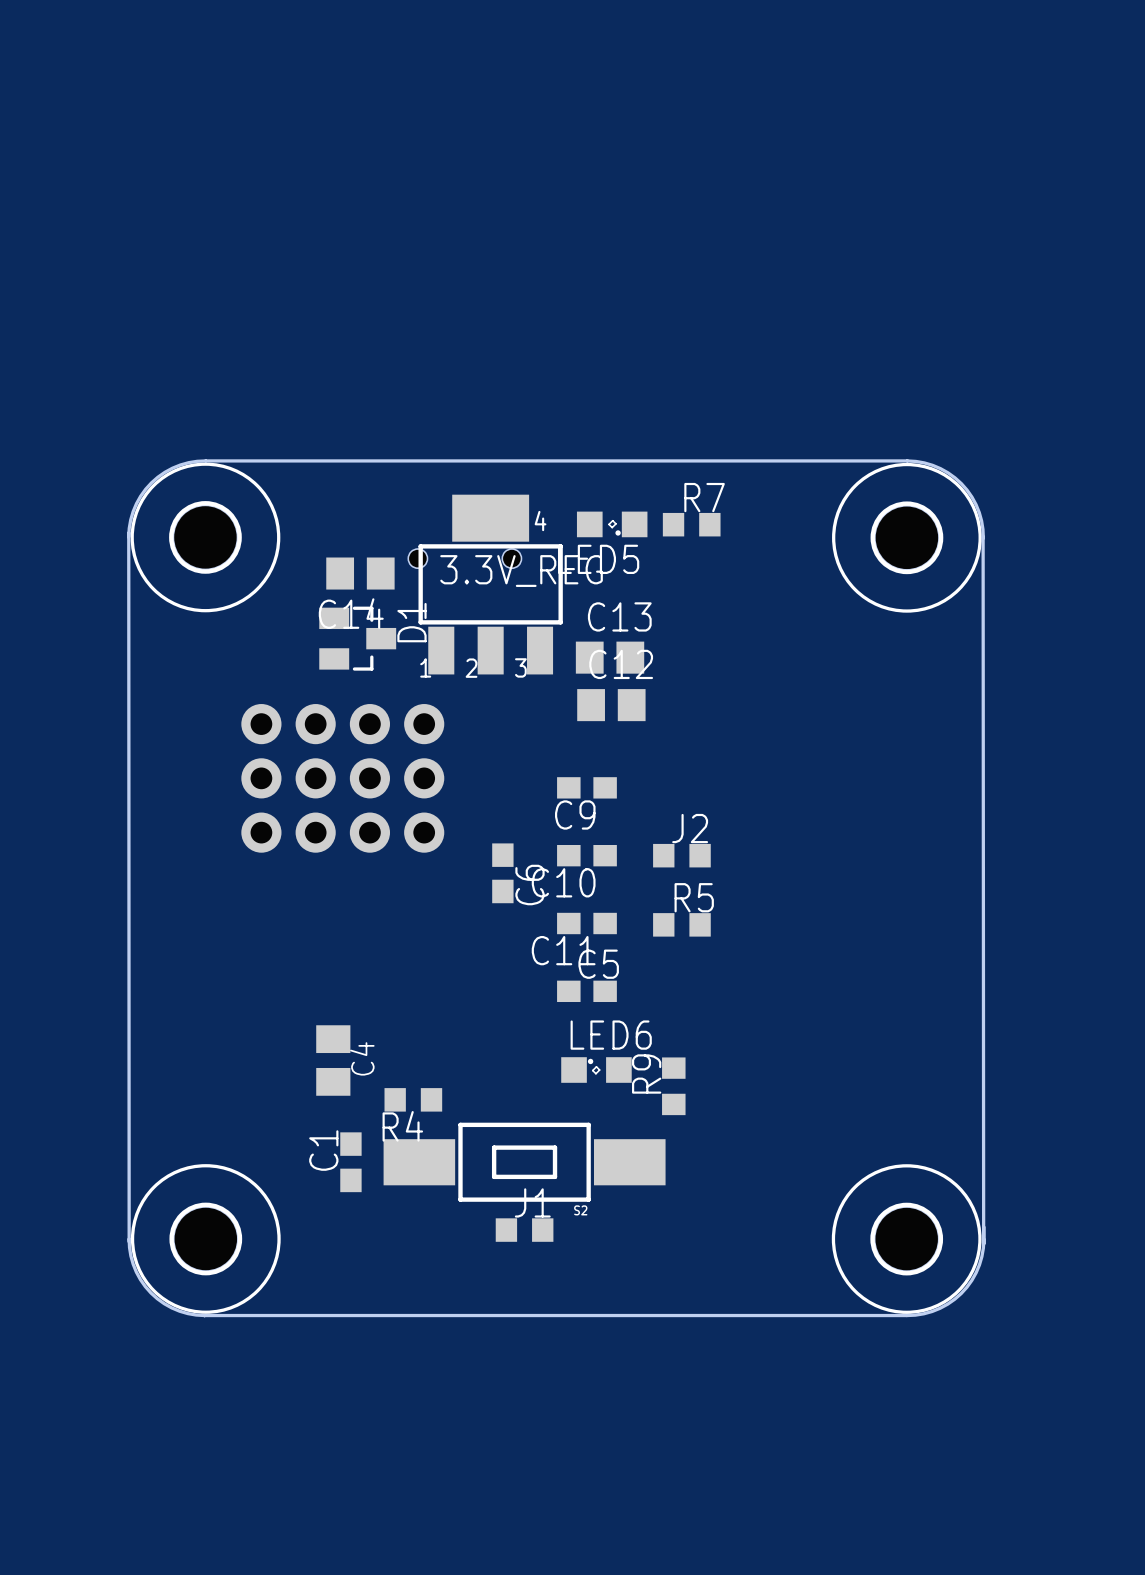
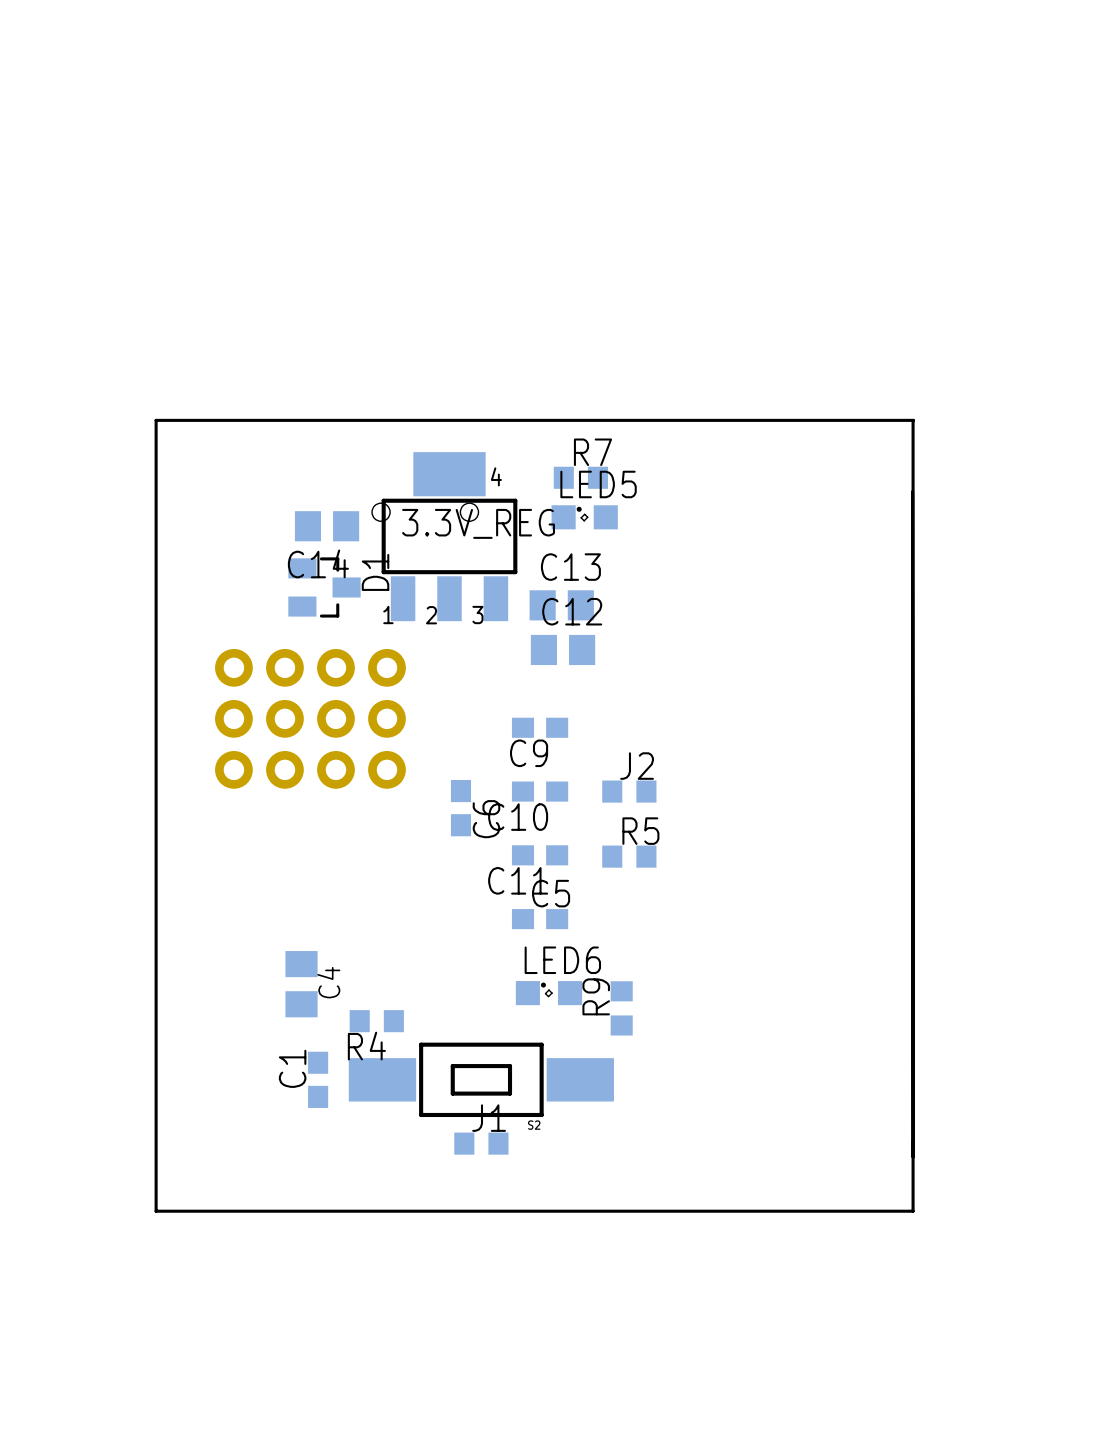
board edge: (205, 460) (188, 462) (172, 468) (151, 482) (136, 503) (130, 519) (128, 536) -> (181, 420) (156, 420) (156, 1211) (913, 1211) (913, 420)
board edge: (907, 460) (924, 462) (940, 468) (961, 483) (976, 504) (981, 520) (983, 537) -> (841, 420) (913, 420)
LED5 rotation: 0° (612, 524) -> 180° (584, 517)
LED5 position: (612, 524) -> (584, 517)
R7 position: (691, 524) -> (580, 477)
board edge: (128, 532) (129, 1241) -> none
part: (205, 537) -> none
part: (906, 537) -> none
part: (205, 1238) -> none
board edge: (129, 1239) (133, 1264) (140, 1279) (151, 1293) (171, 1307) (187, 1313) (204, 1315) -> none
part: (906, 1239) -> none
board edge: (983, 1239) (981, 1256) (976, 1272) (961, 1293) (940, 1308) (915, 1315) (204, 1315) -> none

